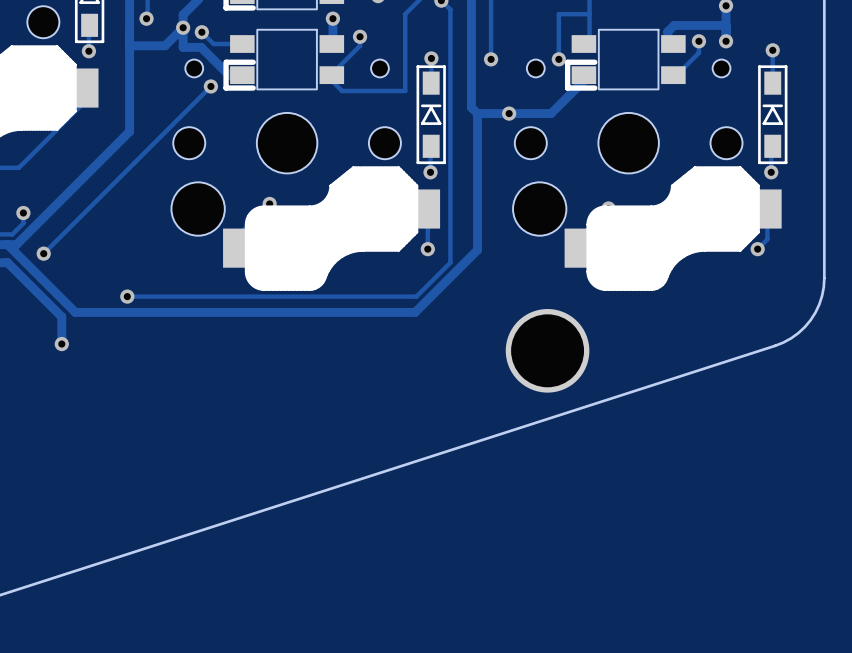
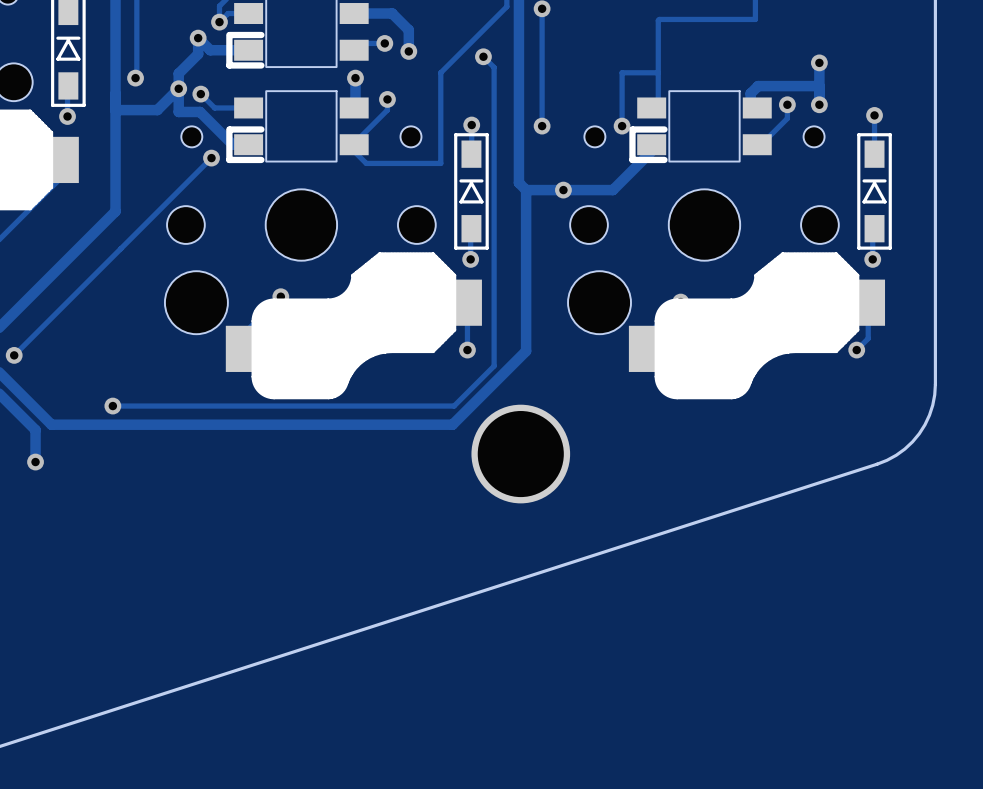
part position: (547, 350) -> (520, 454)

